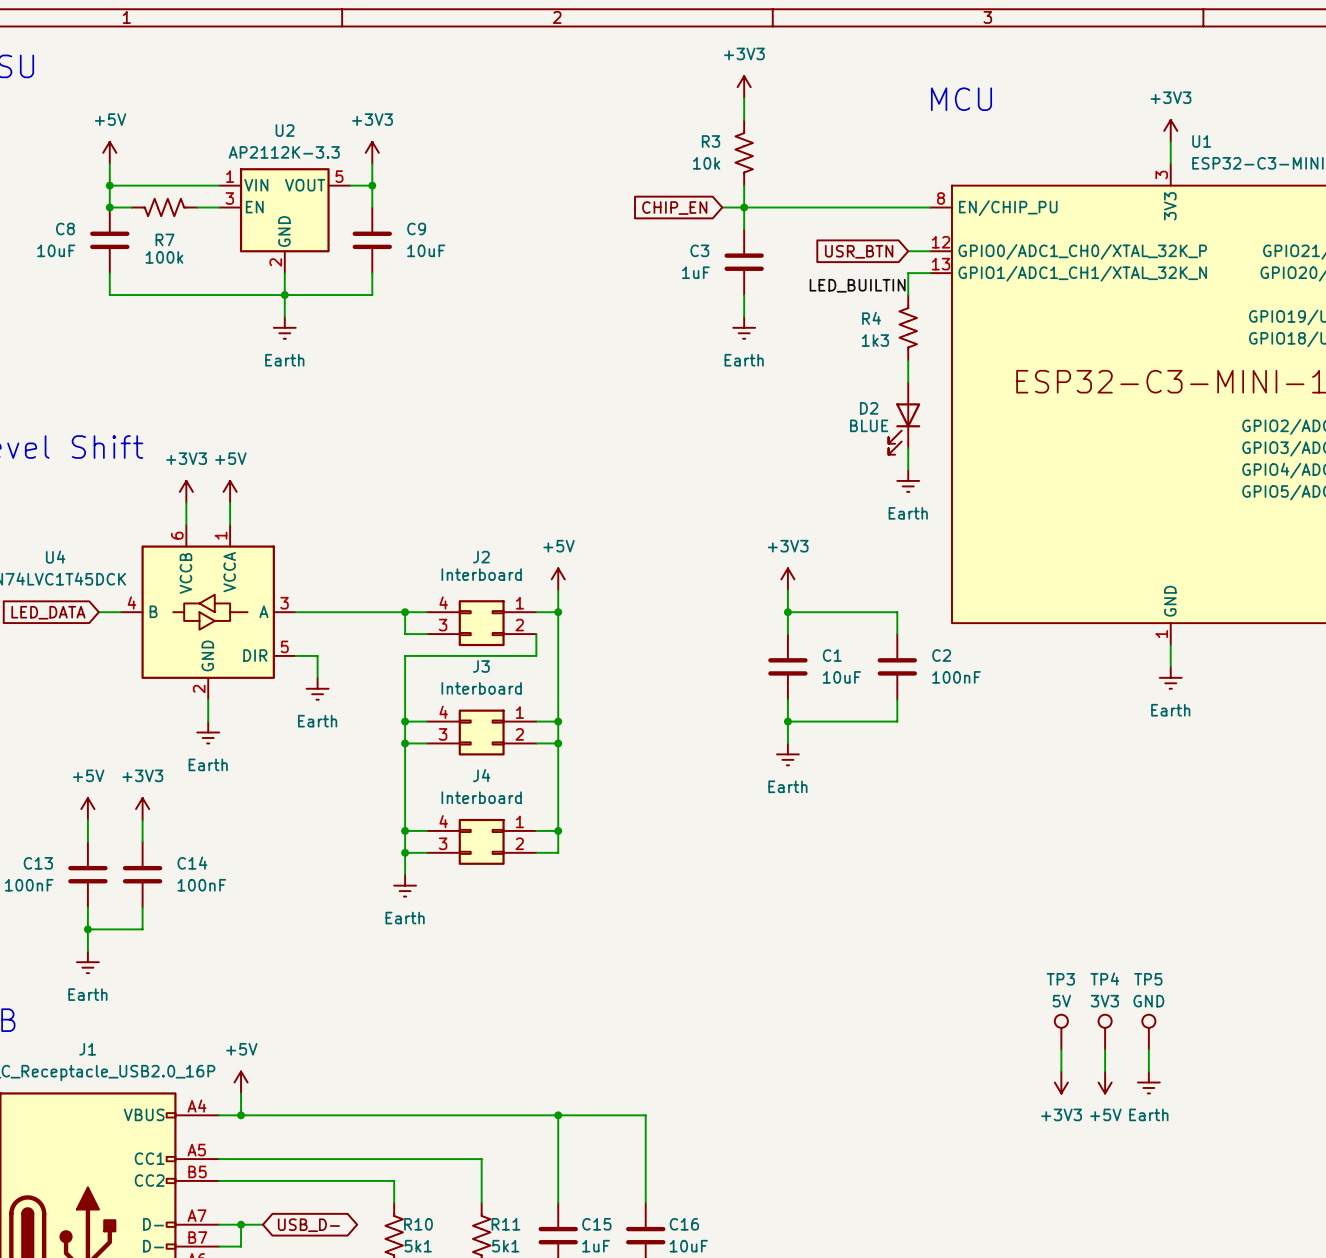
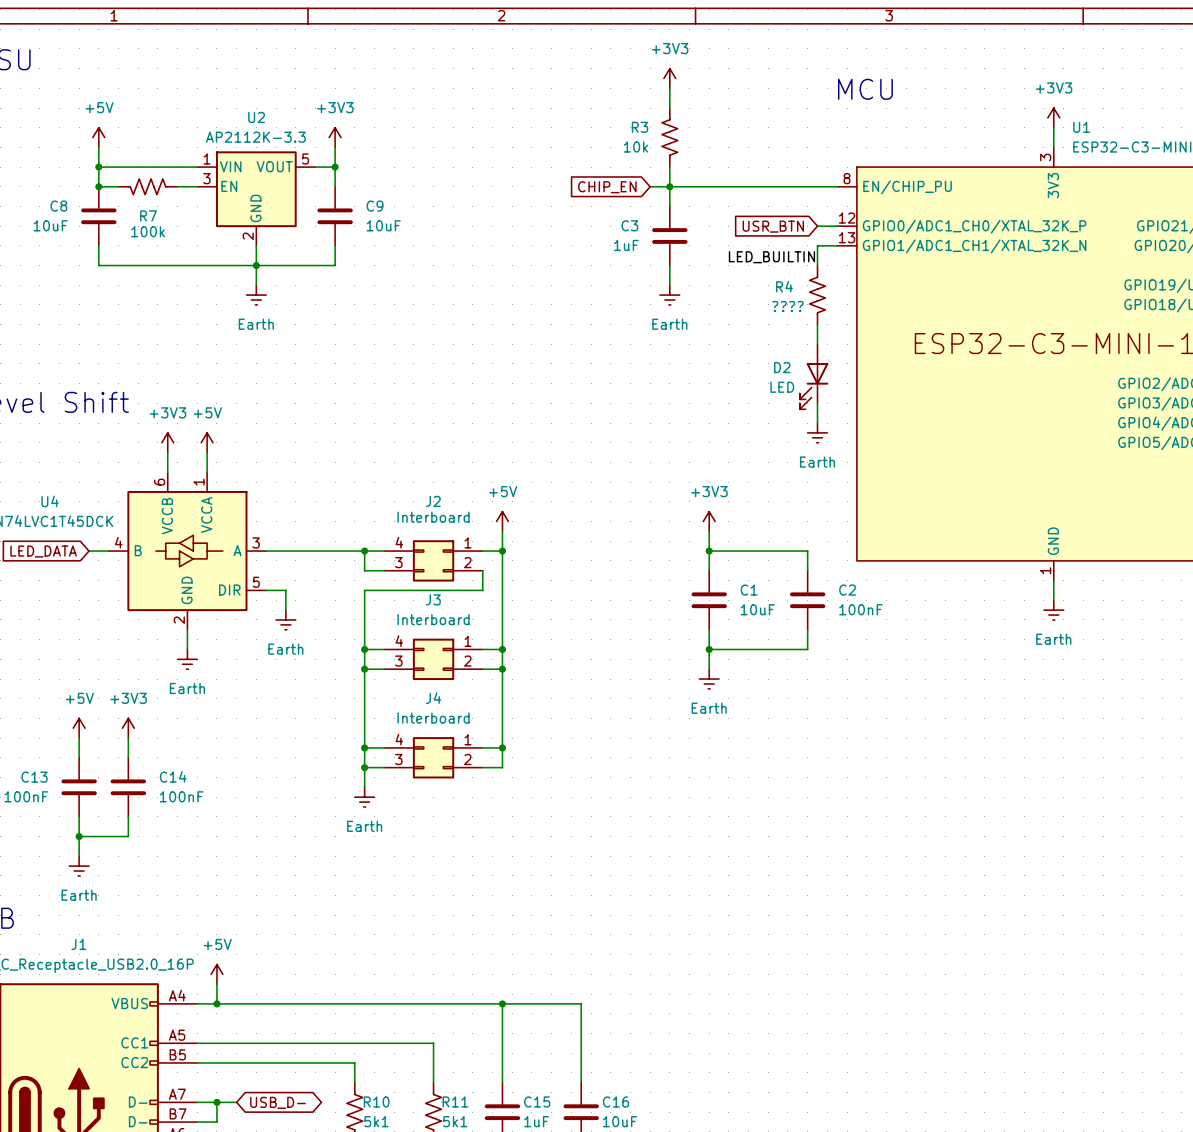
R4 value: 1k3 (875, 340) -> ???? (787, 306)
D2 value: BLUE (869, 425) -> LED (782, 387)
TP3: 5V (1061, 1032) -> none
TP4: 3V3 (1105, 1032) -> none
TP5: GND (1148, 1032) -> none
wire: (1061, 1049) (1061, 1071) -> none
wire: (1105, 1049) (1105, 1071) -> none
wire: (1148, 1049) (1148, 1071) -> none
power symbol: +3V3 (1061, 1082) -> none
power symbol: +5V (1105, 1082) -> none
power symbol: Earth (1148, 1082) -> none

